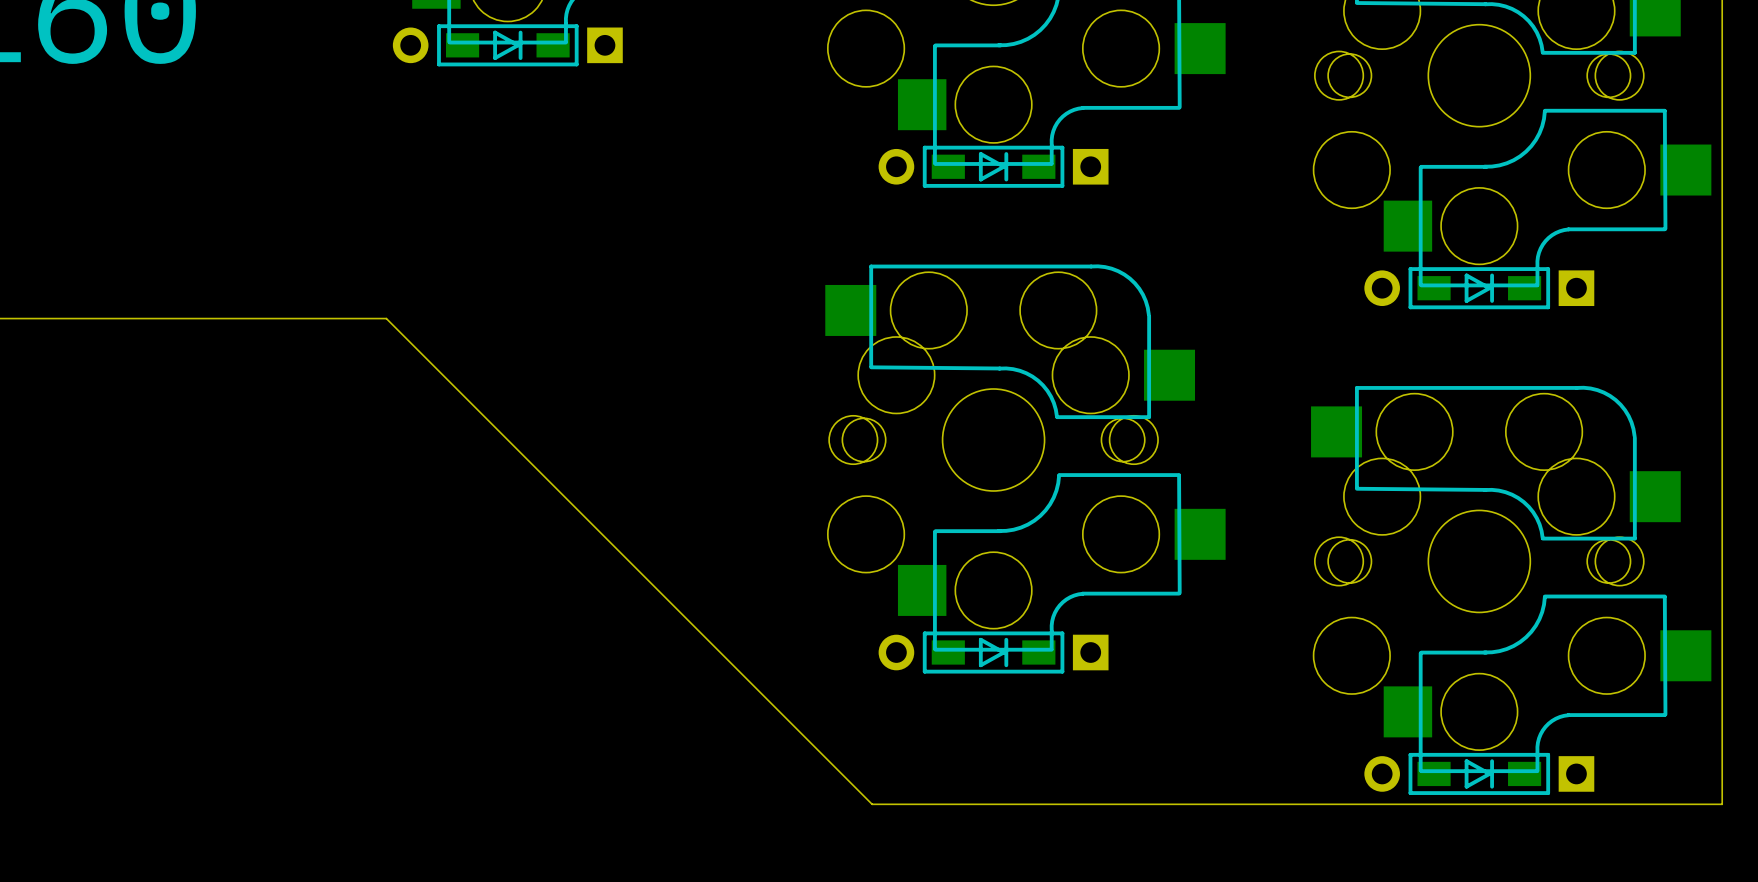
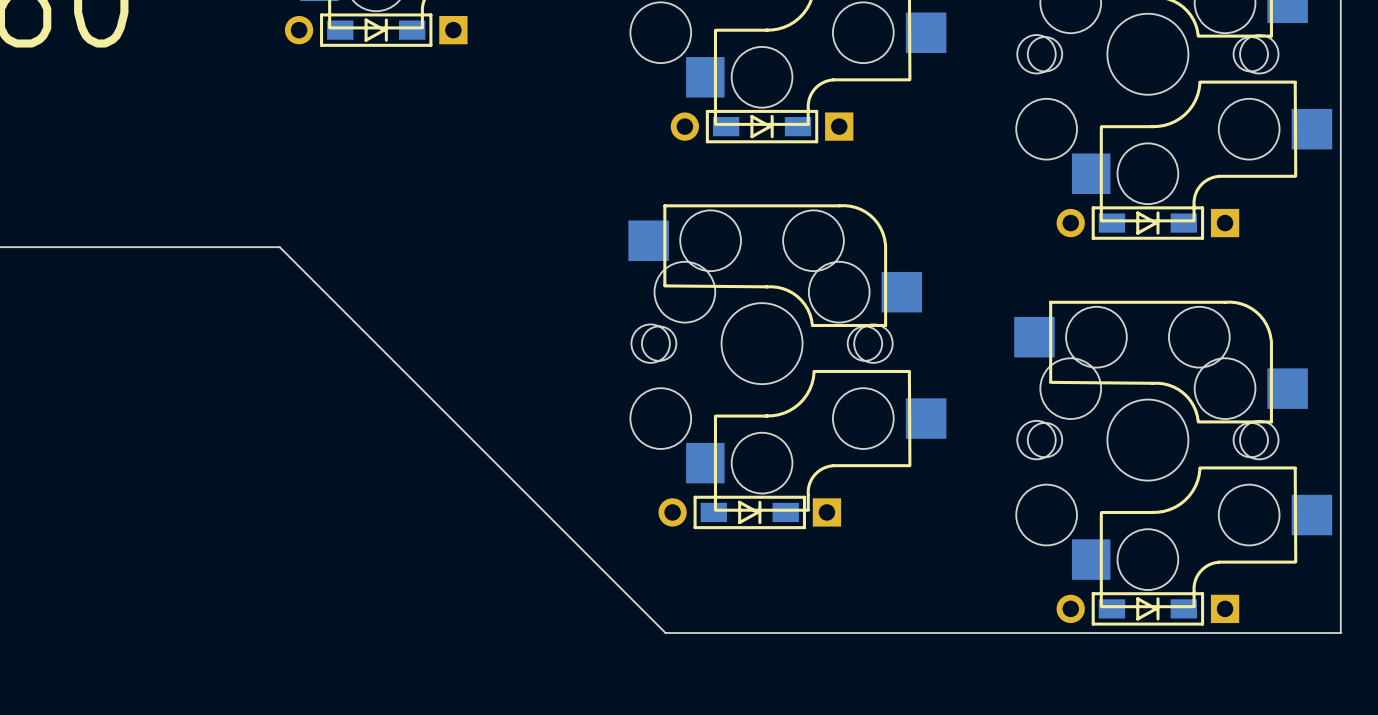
part position: (993, 652) -> (749, 512)

